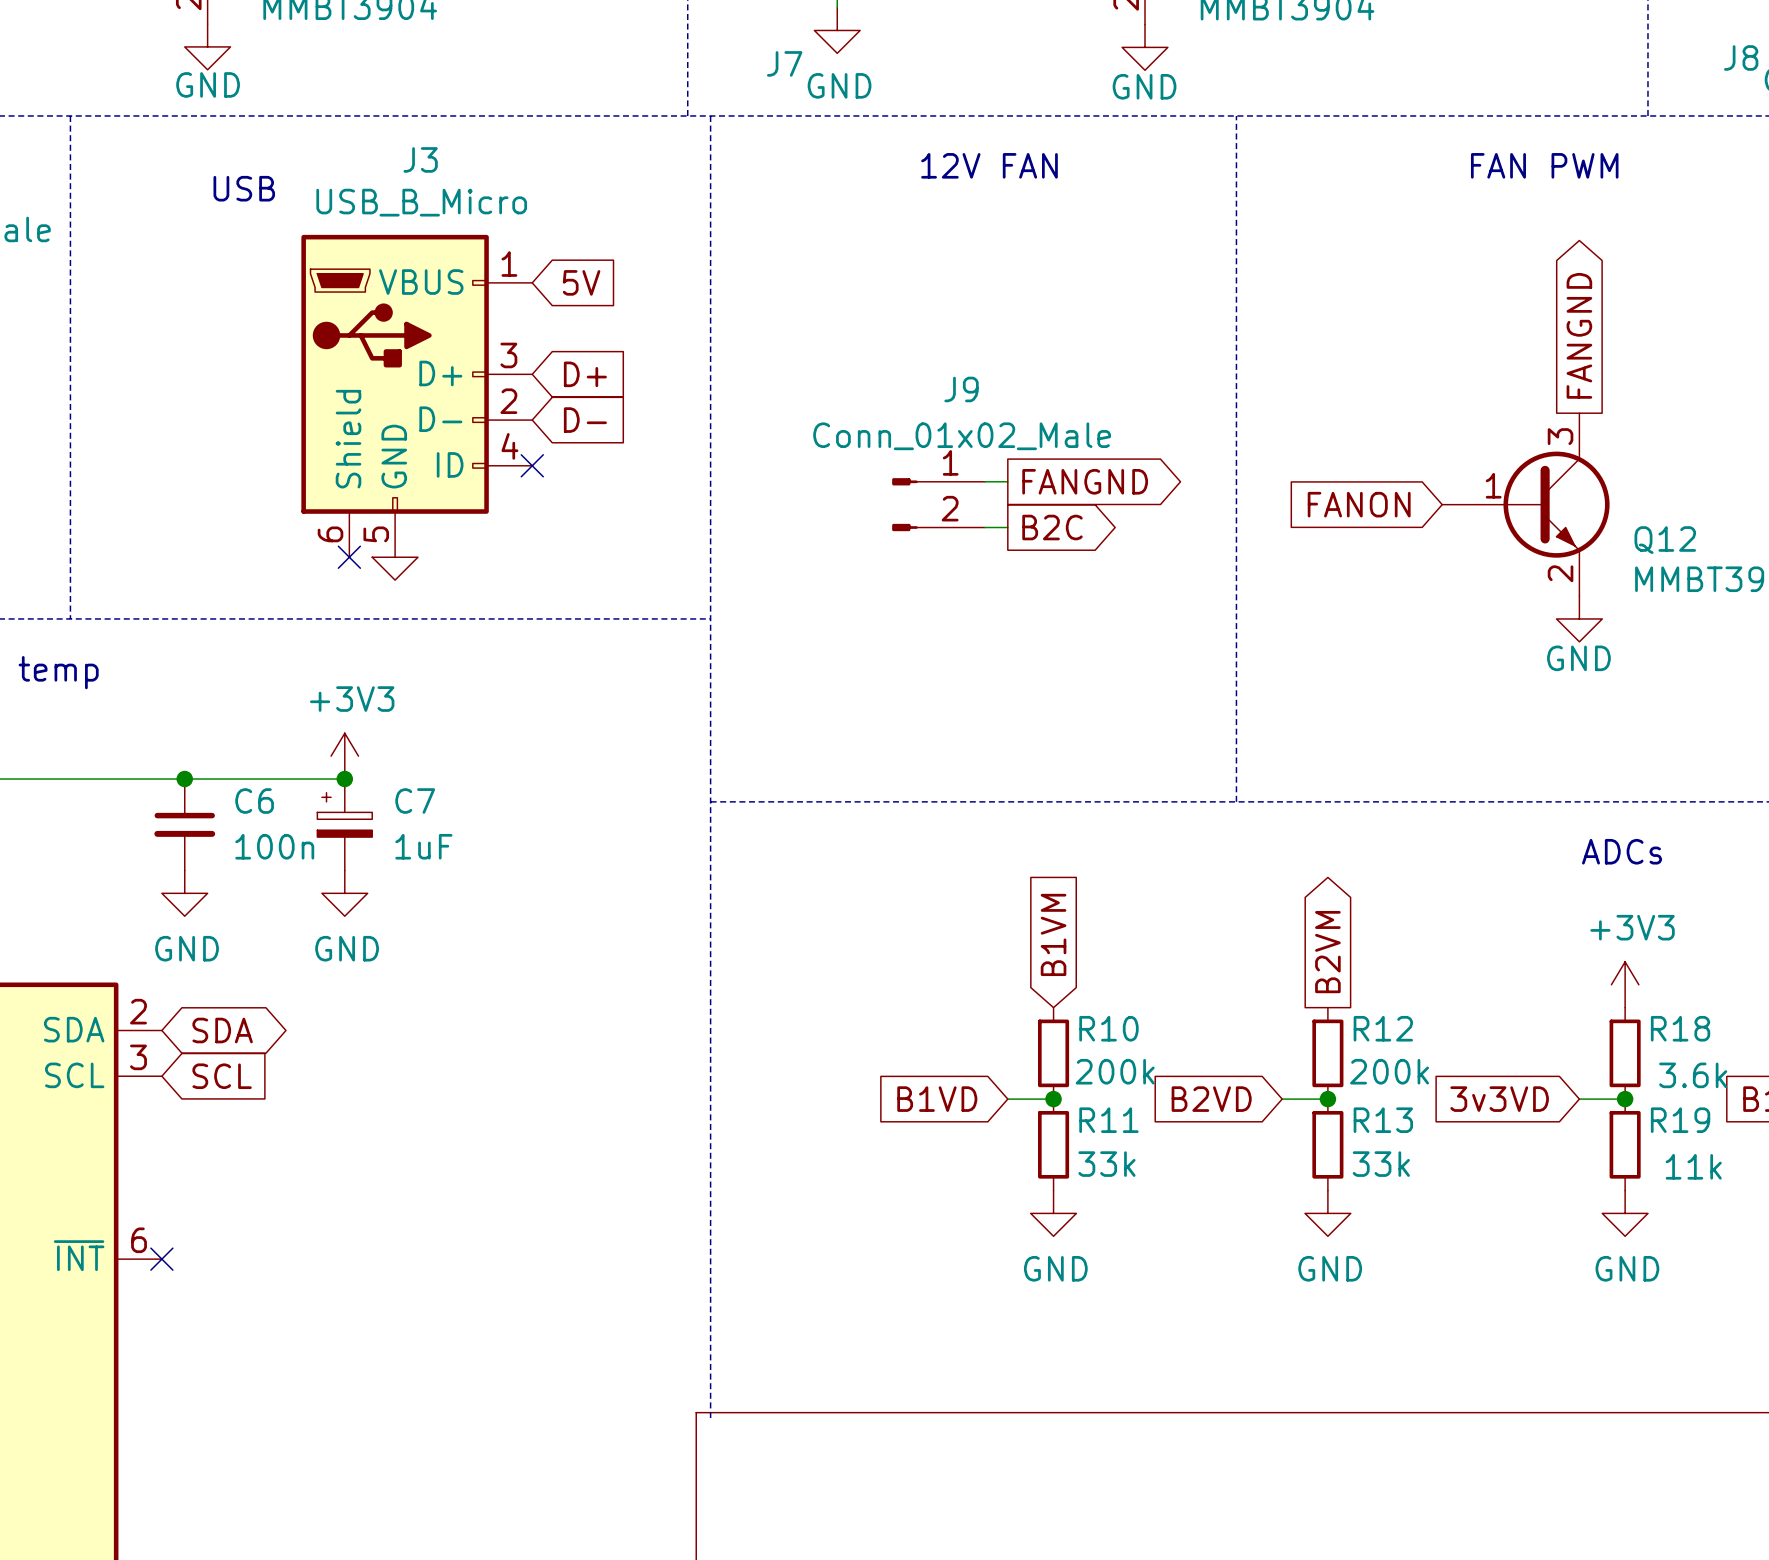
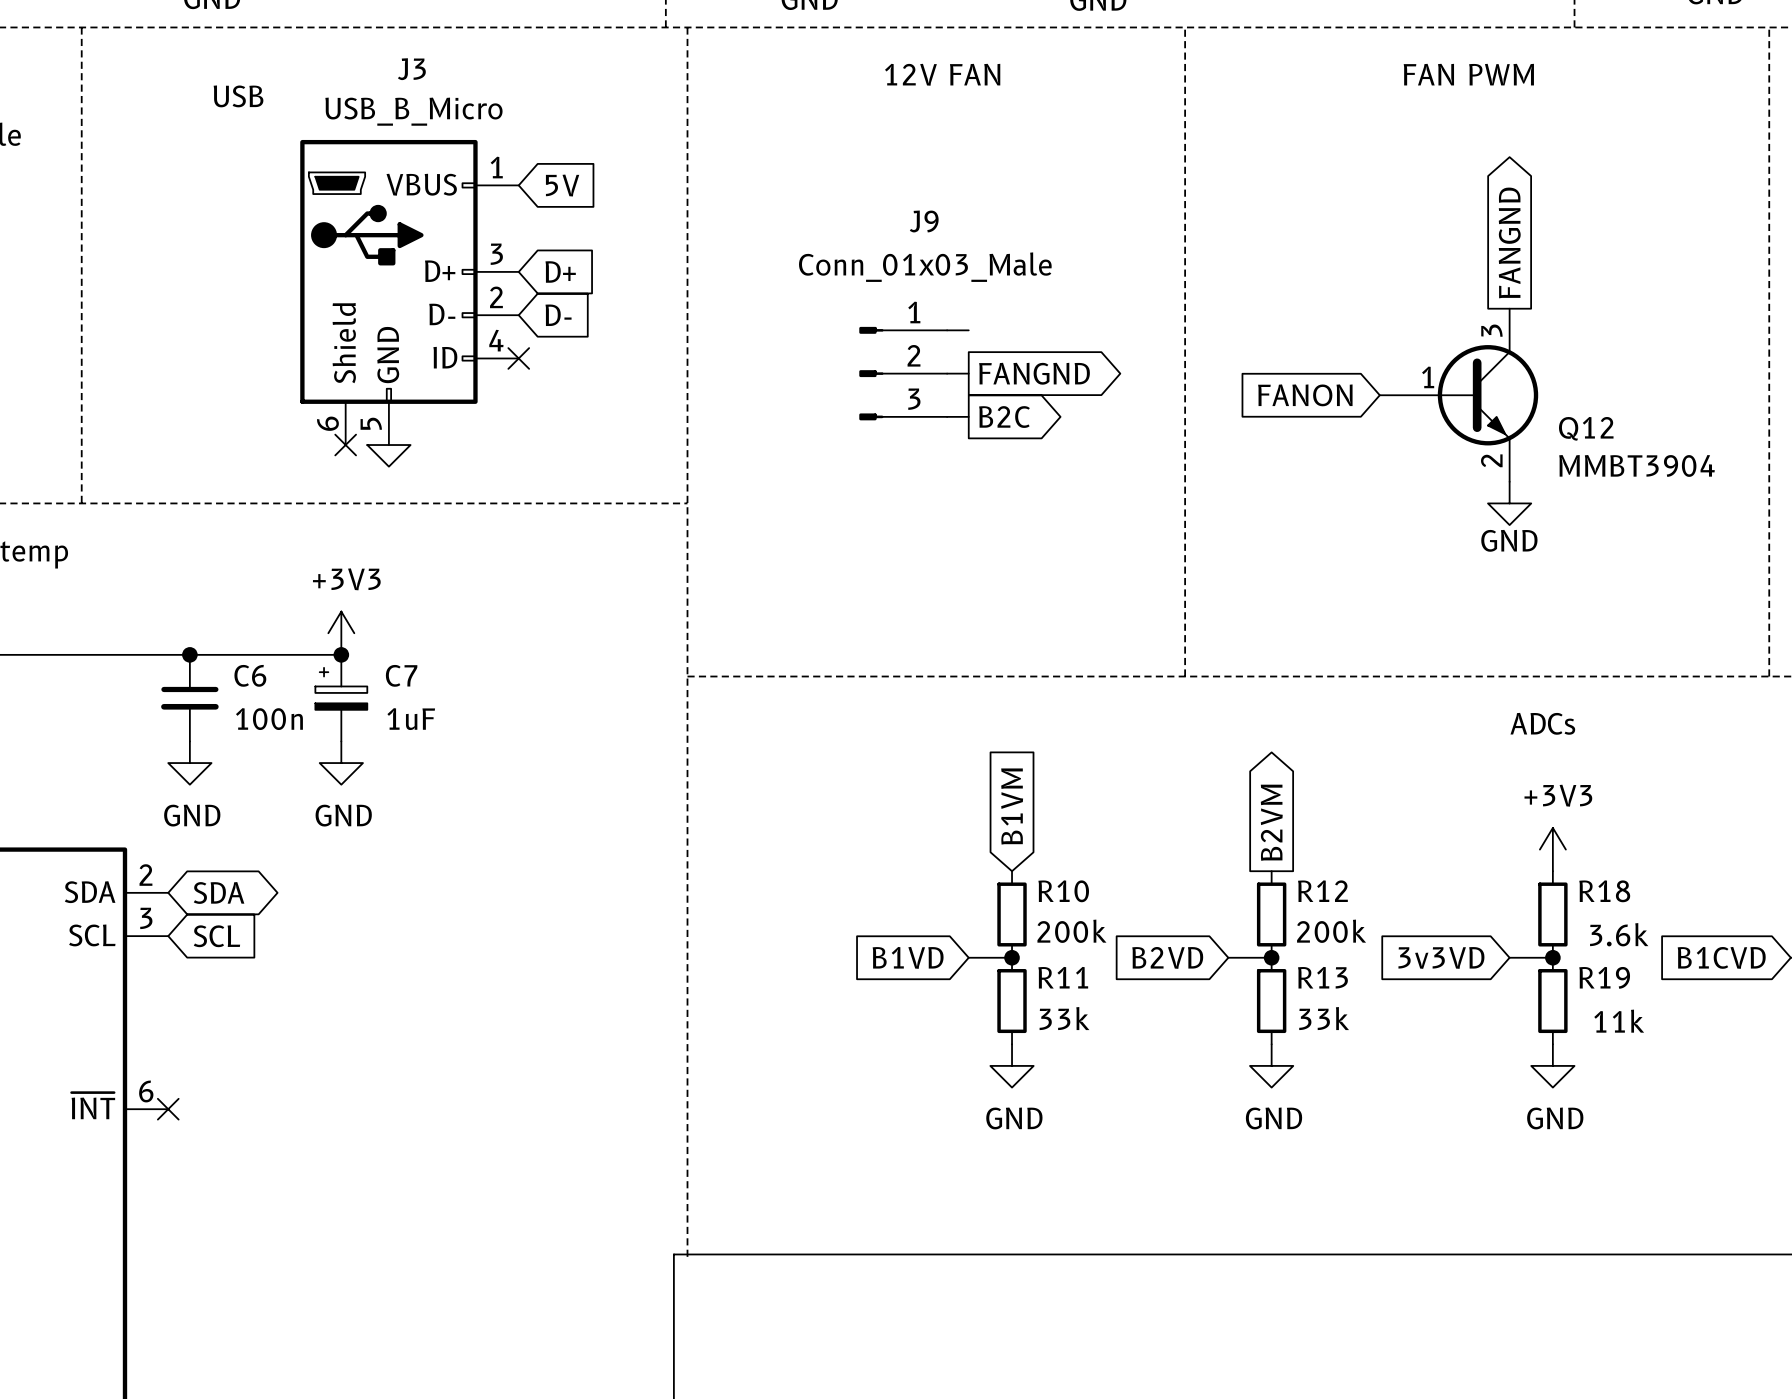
J9 name position: J9 (961, 389) -> J9 (924, 221)
J9 value: Conn_01x02_Male (962, 436) -> Conn_01x03_Male (925, 267)
wire: none -> (947, 330) (968, 330)
J9 symbol: [892, 478, 985, 532] -> [859, 326, 948, 421]

